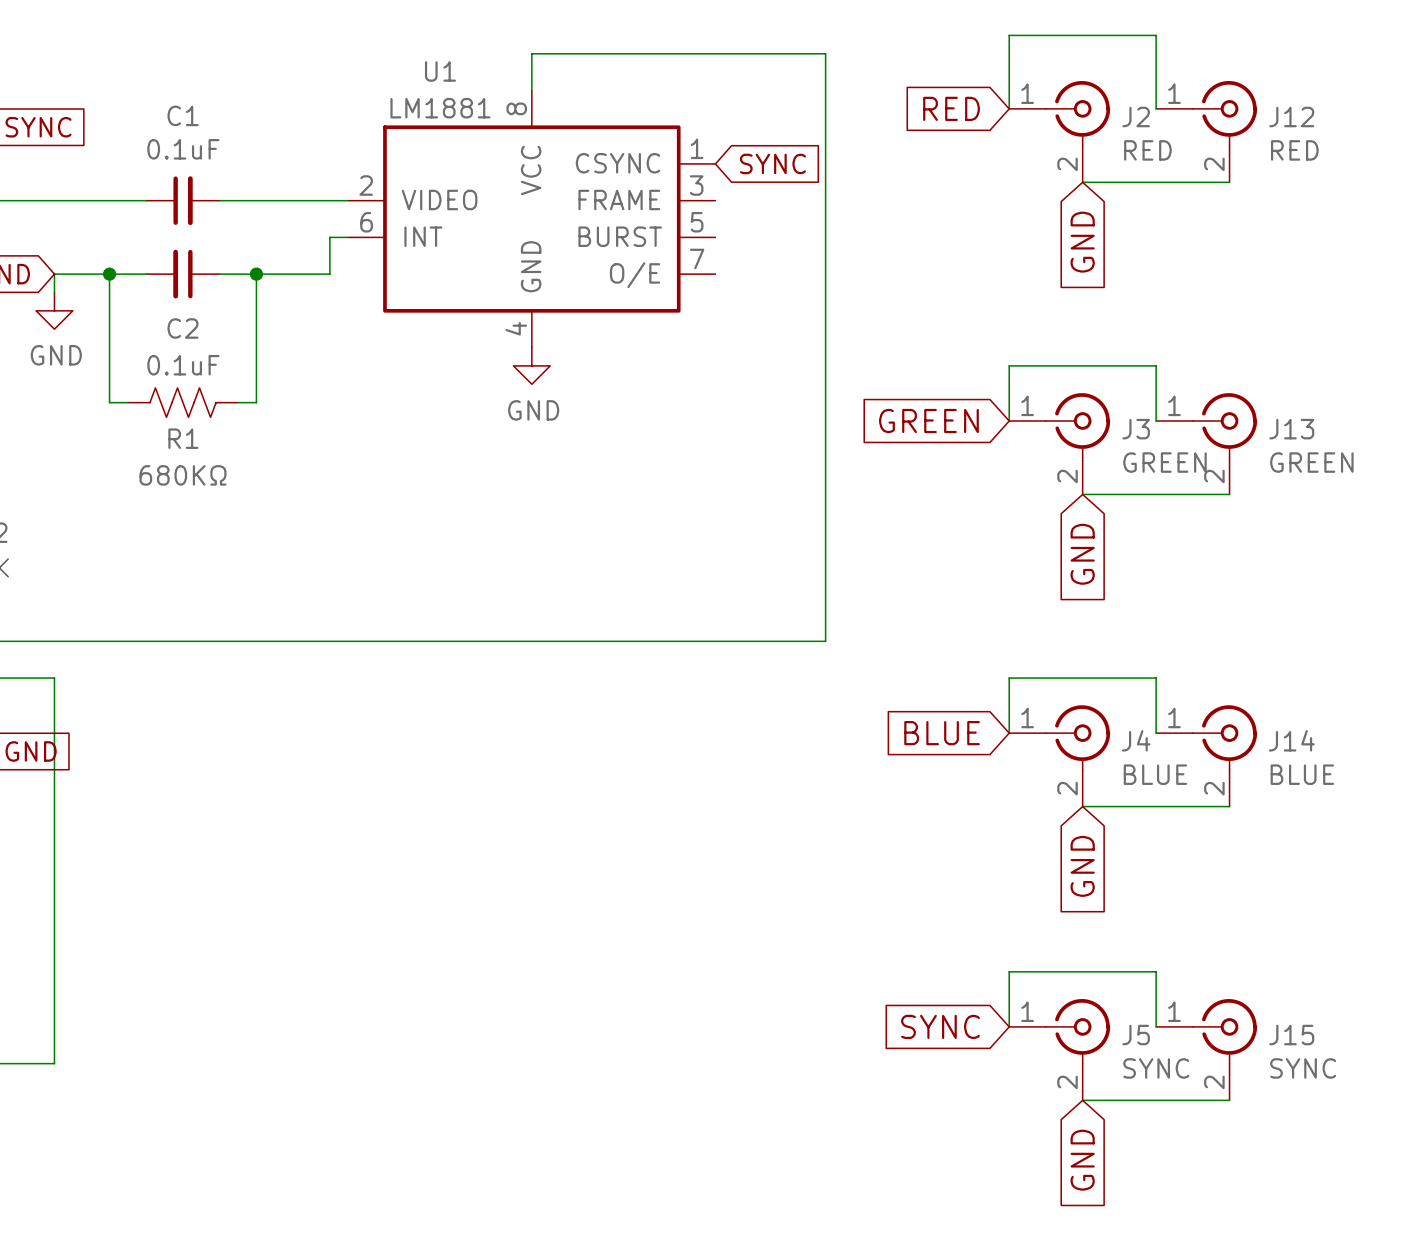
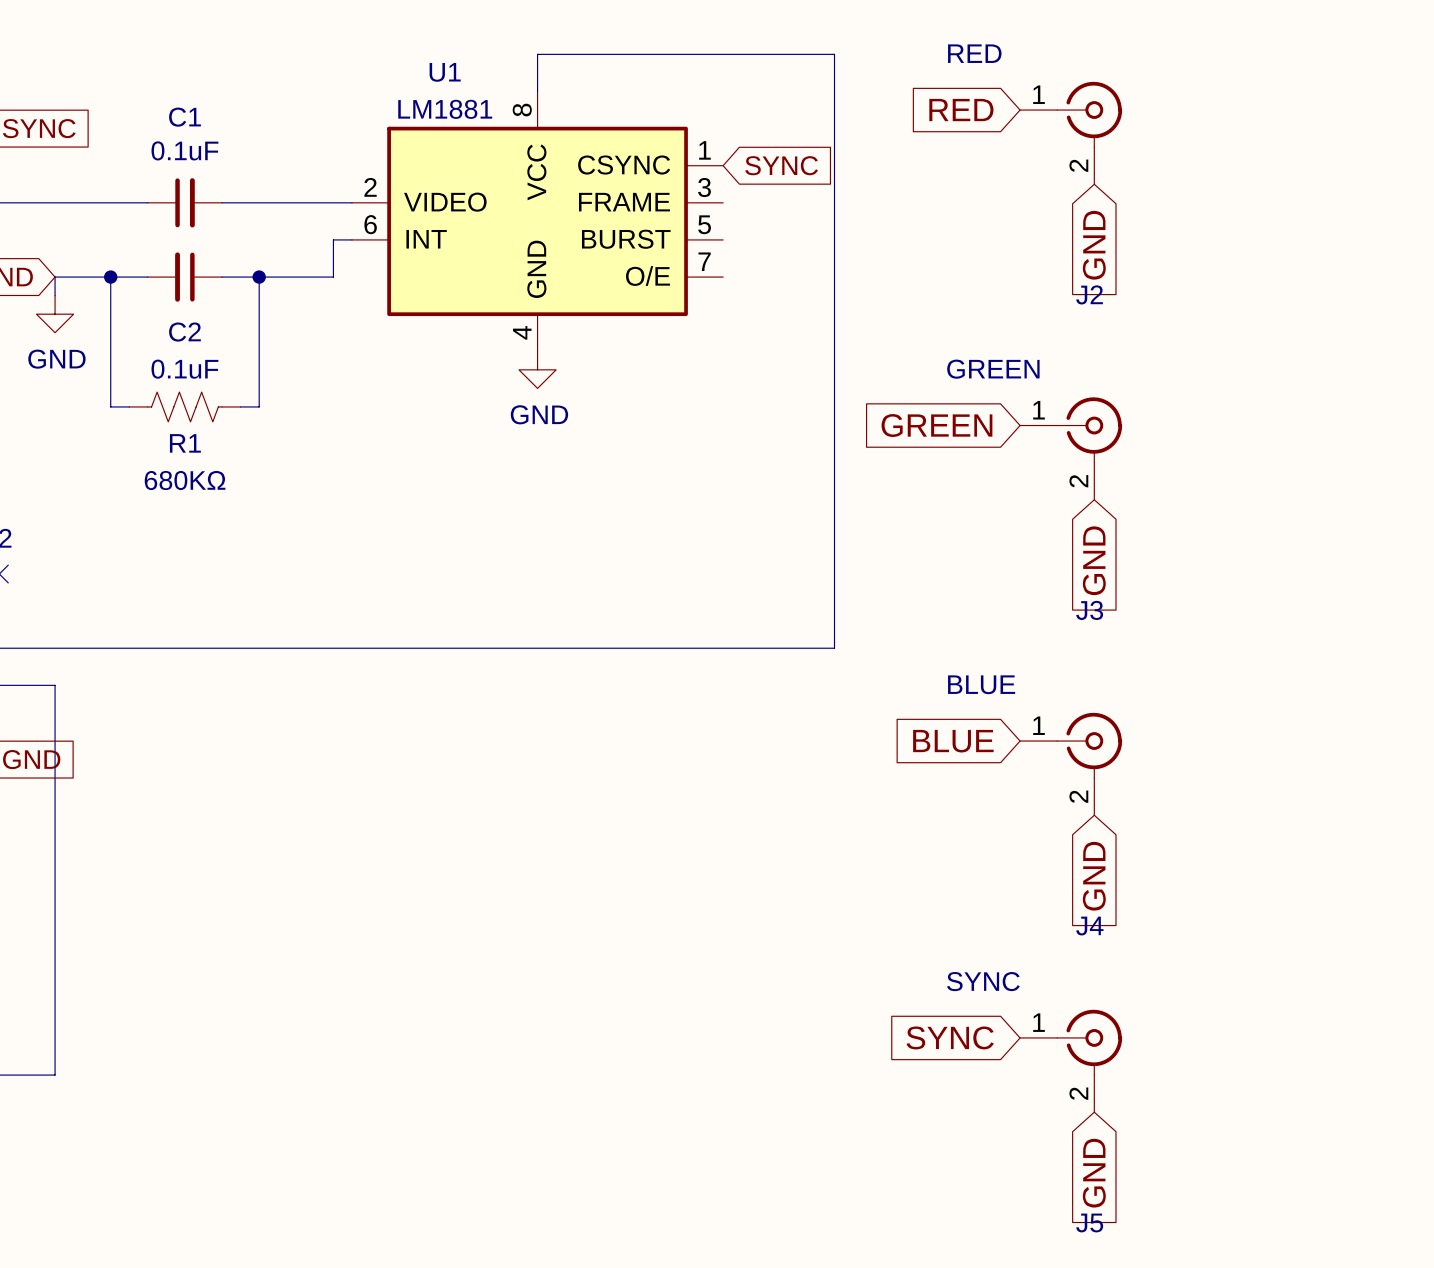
wire: (1009, 108) (1009, 35) (1156, 35) (1156, 108) -> none
J2 name position: J2 (1136, 116) -> J2 (1089, 294)
J12: RED (1206, 131) -> none
J2 value position: RED (1147, 150) -> RED (974, 53)
wire: (1082, 182) (1229, 182) -> none
wire: (1009, 421) (1009, 365) (1156, 365) (1156, 421) -> none
J3 name position: J3 (1136, 429) -> J3 (1089, 610)
J13: GREEN (1206, 443) -> none
J3 value position: GREEN (1164, 462) -> GREEN (993, 369)
wire: (1082, 494) (1229, 494) -> none
wire: (1009, 733) (1009, 678) (1156, 678) (1156, 733) -> none
J4 name position: J4 (1136, 740) -> J4 (1089, 926)
J14: BLUE (1206, 755) -> none
J4 value position: BLUE (1155, 774) -> BLUE (981, 684)
wire: (1082, 806) (1229, 806) -> none
wire: (1009, 1026) (1009, 971) (1156, 971) (1156, 1026) -> none
J5 name position: J5 (1136, 1035) -> J5 (1089, 1222)
J15: SYNC (1206, 1049) -> none
J5 value position: SYNC (1156, 1068) -> SYNC (983, 981)
wire: (1082, 1100) (1229, 1100) -> none

